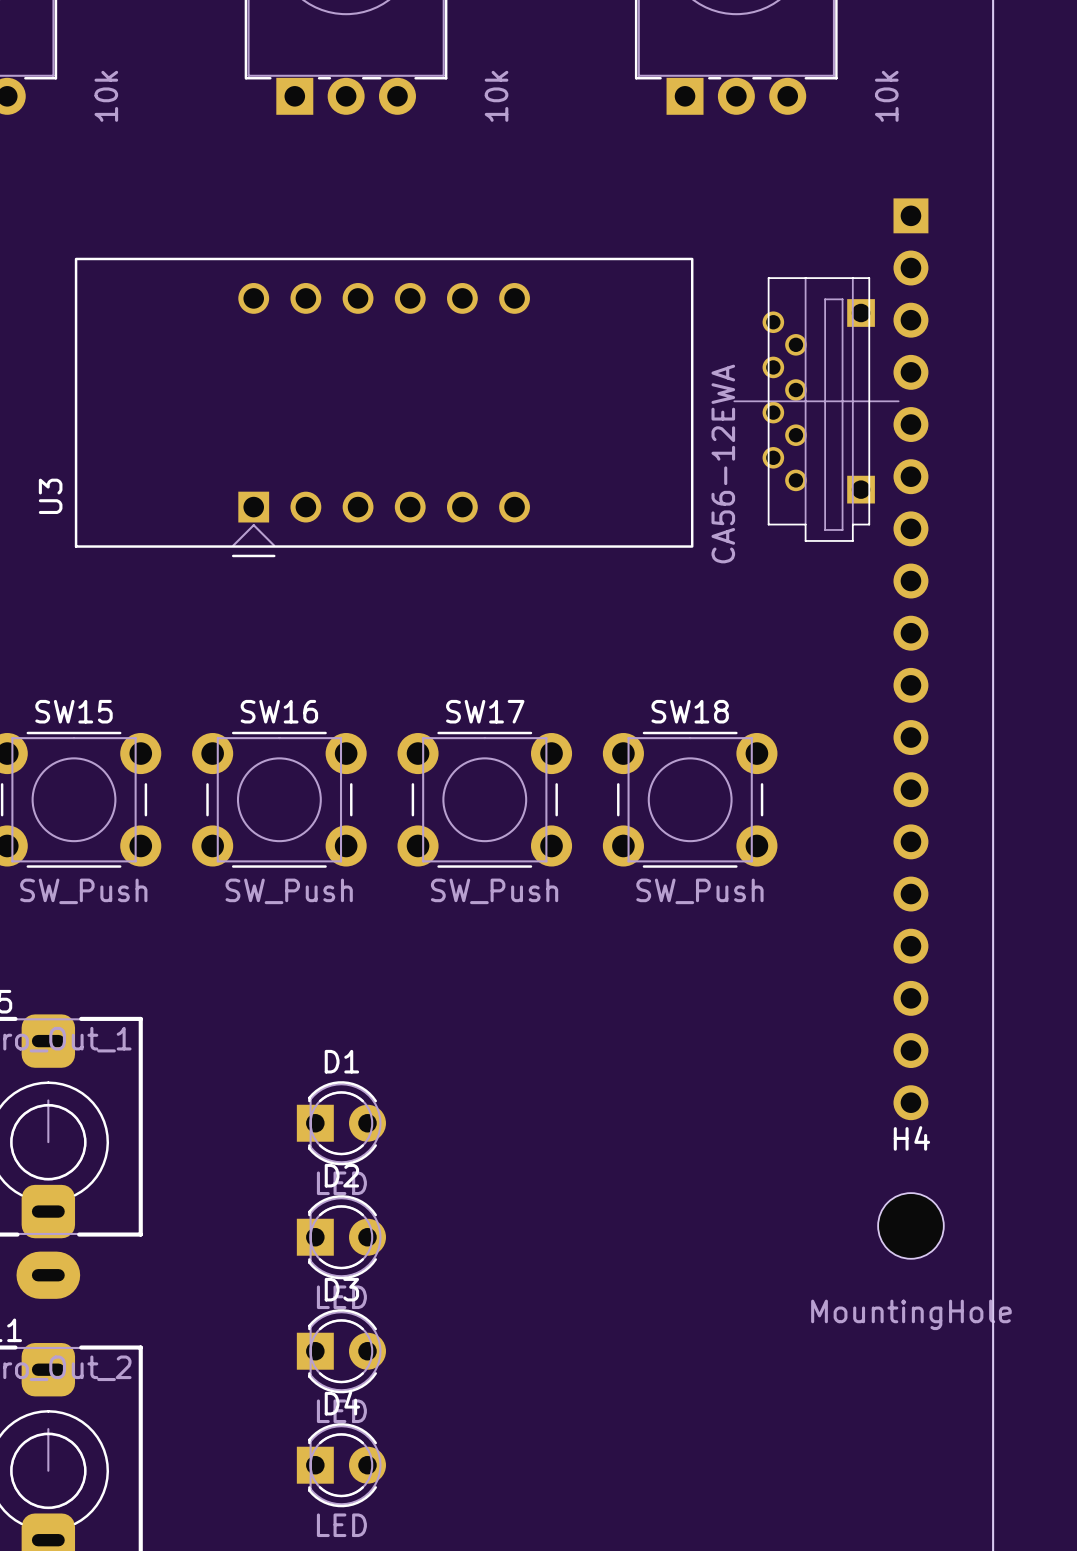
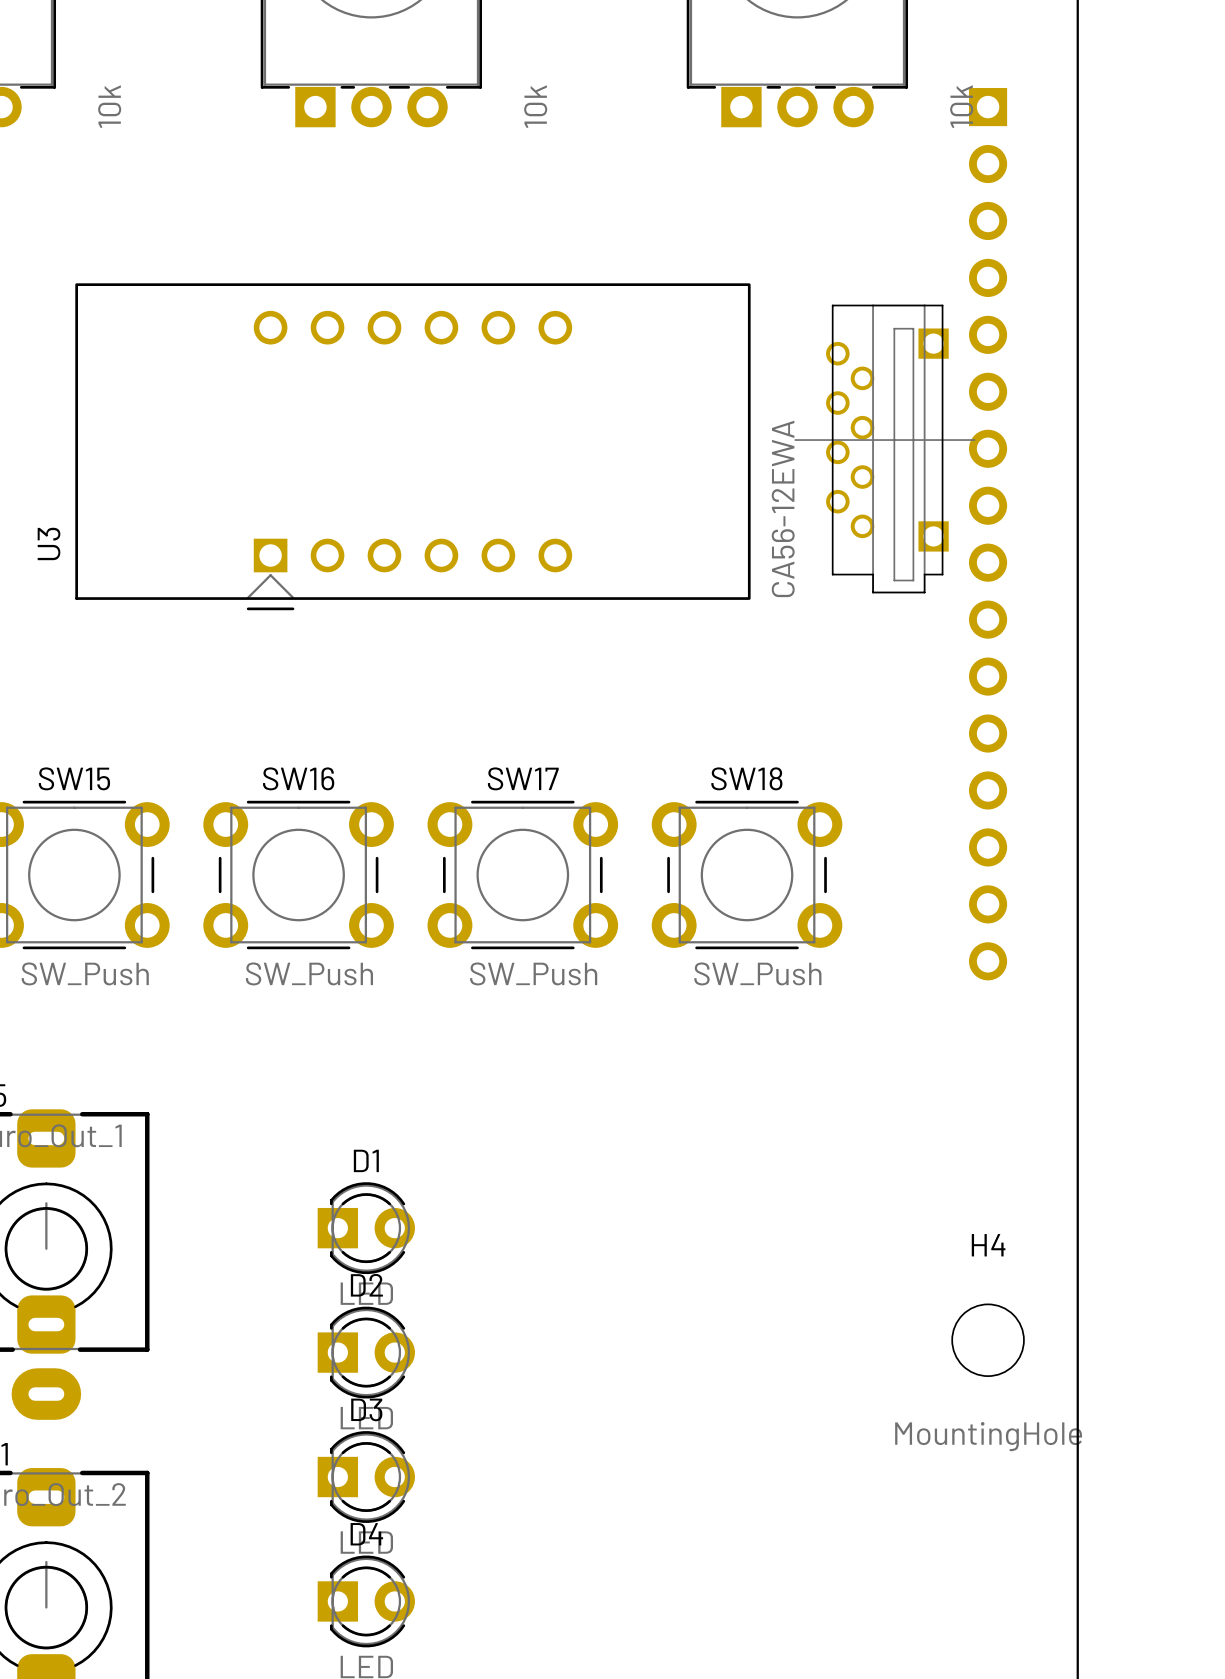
part: none -> (988, 534)
part: (910, 659) -> none

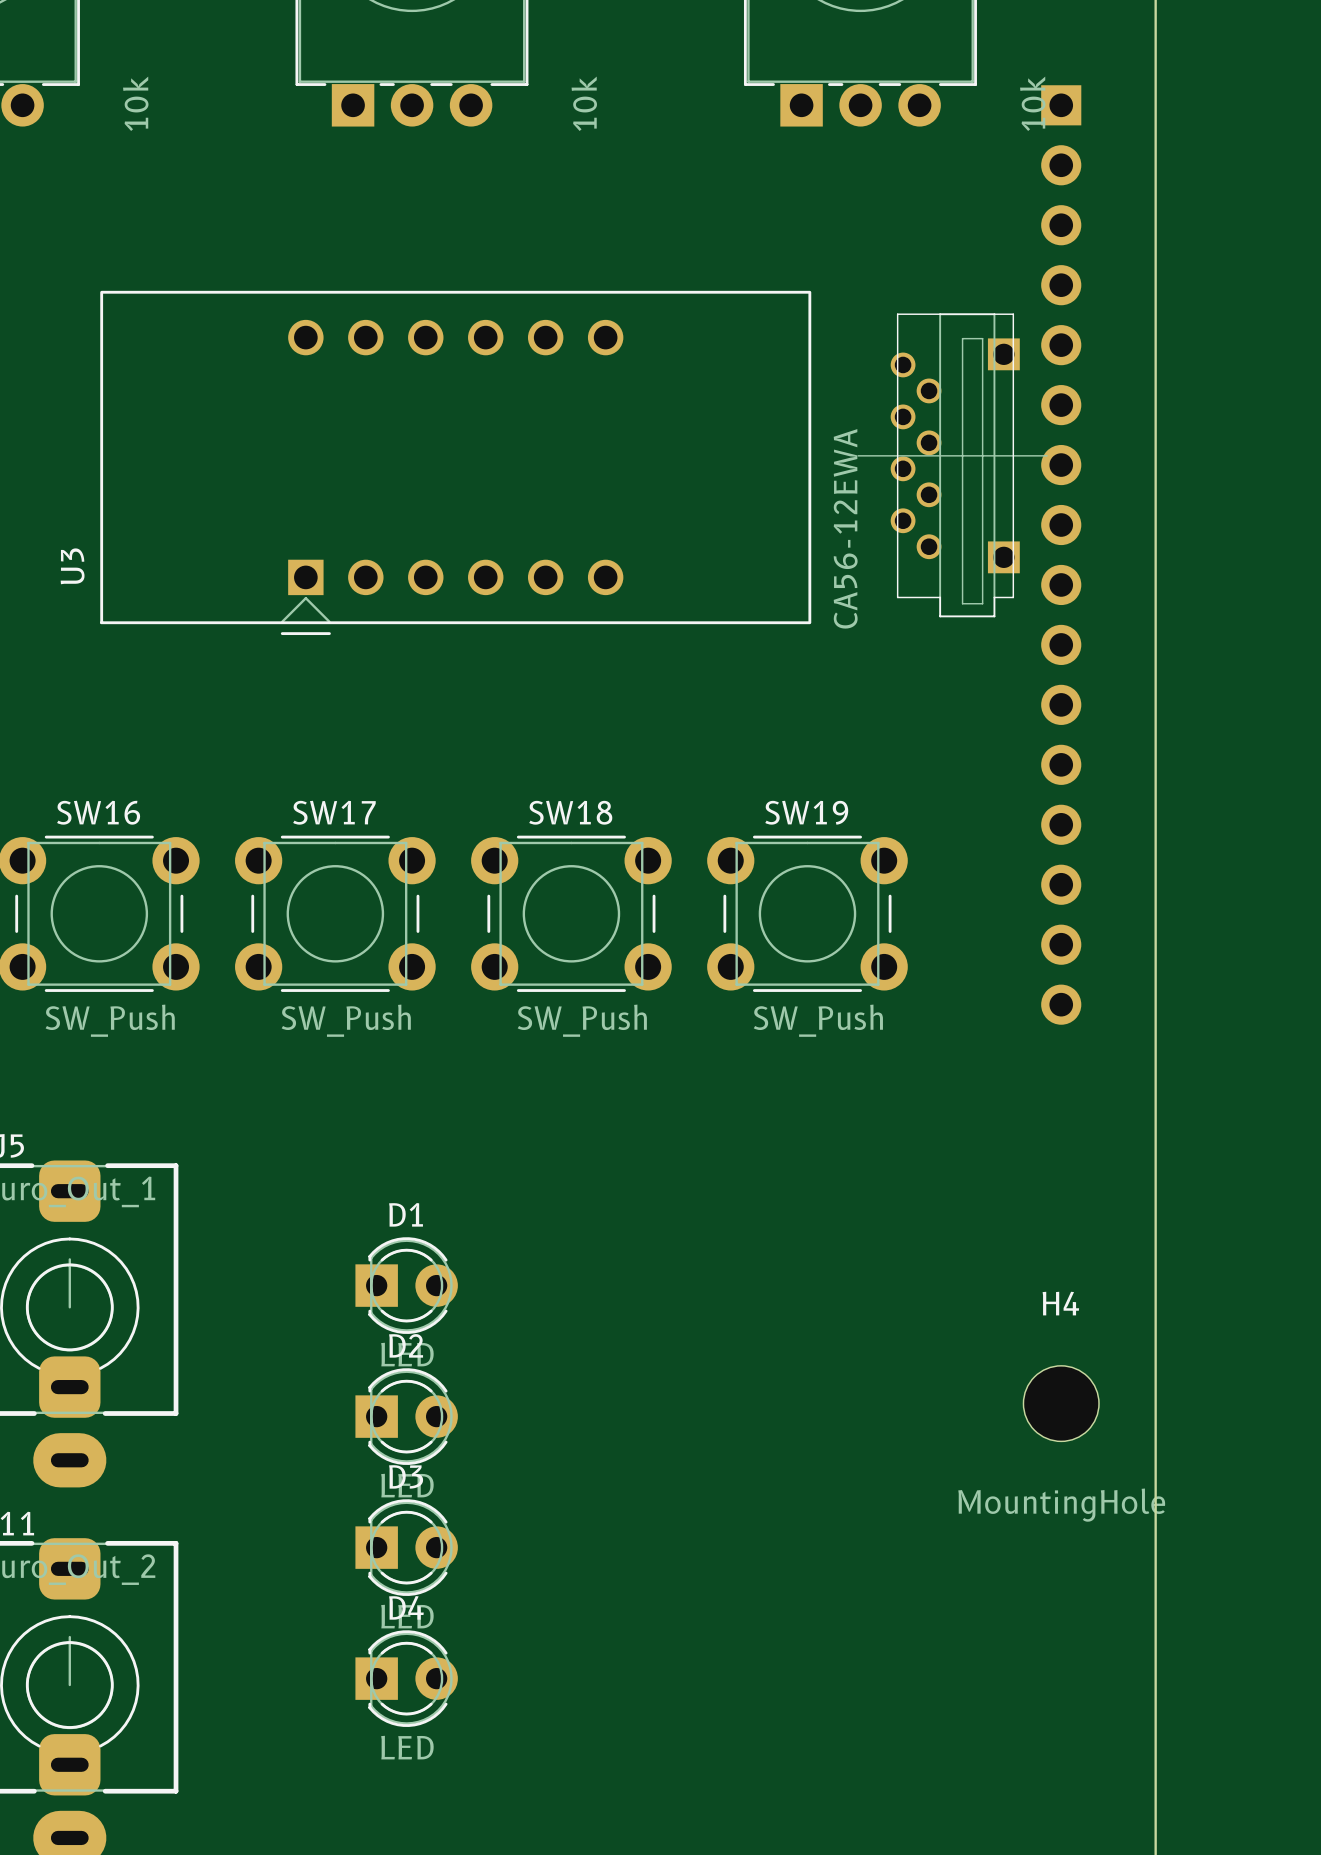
SW15 name: SW15 (74, 778) -> SW16 (98, 812)
SW16 name: SW16 (298, 778) -> SW17 (334, 812)
SW17 name: SW17 (523, 778) -> SW18 (570, 812)
SW18 name: SW18 (746, 778) -> SW19 (806, 812)

